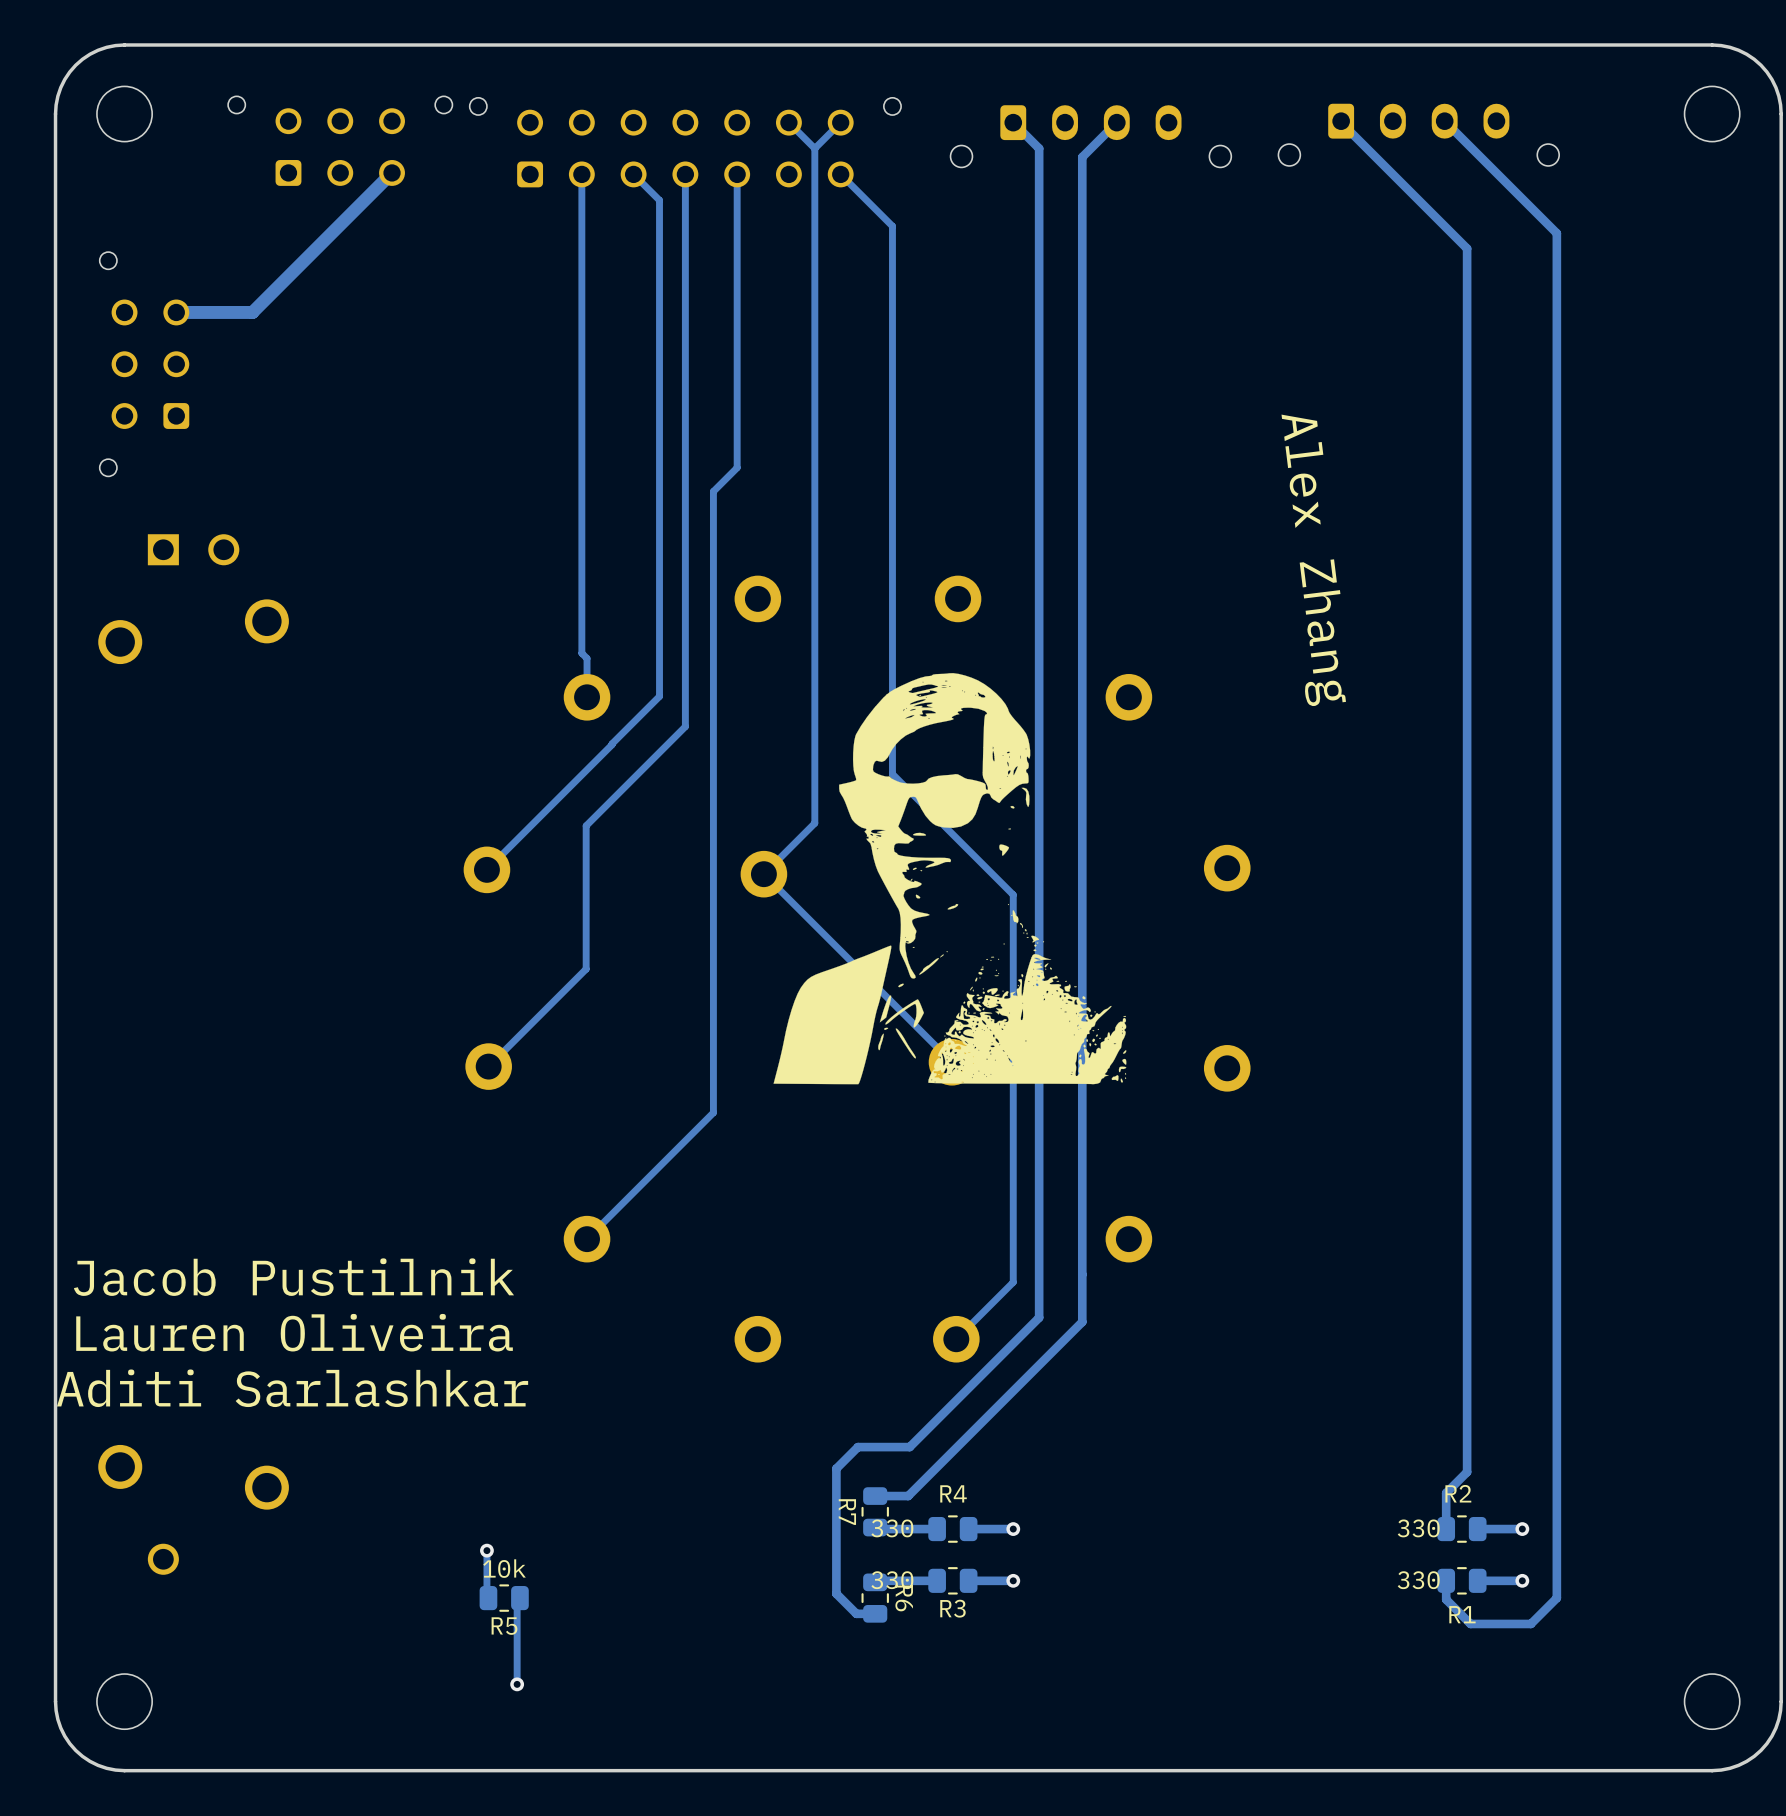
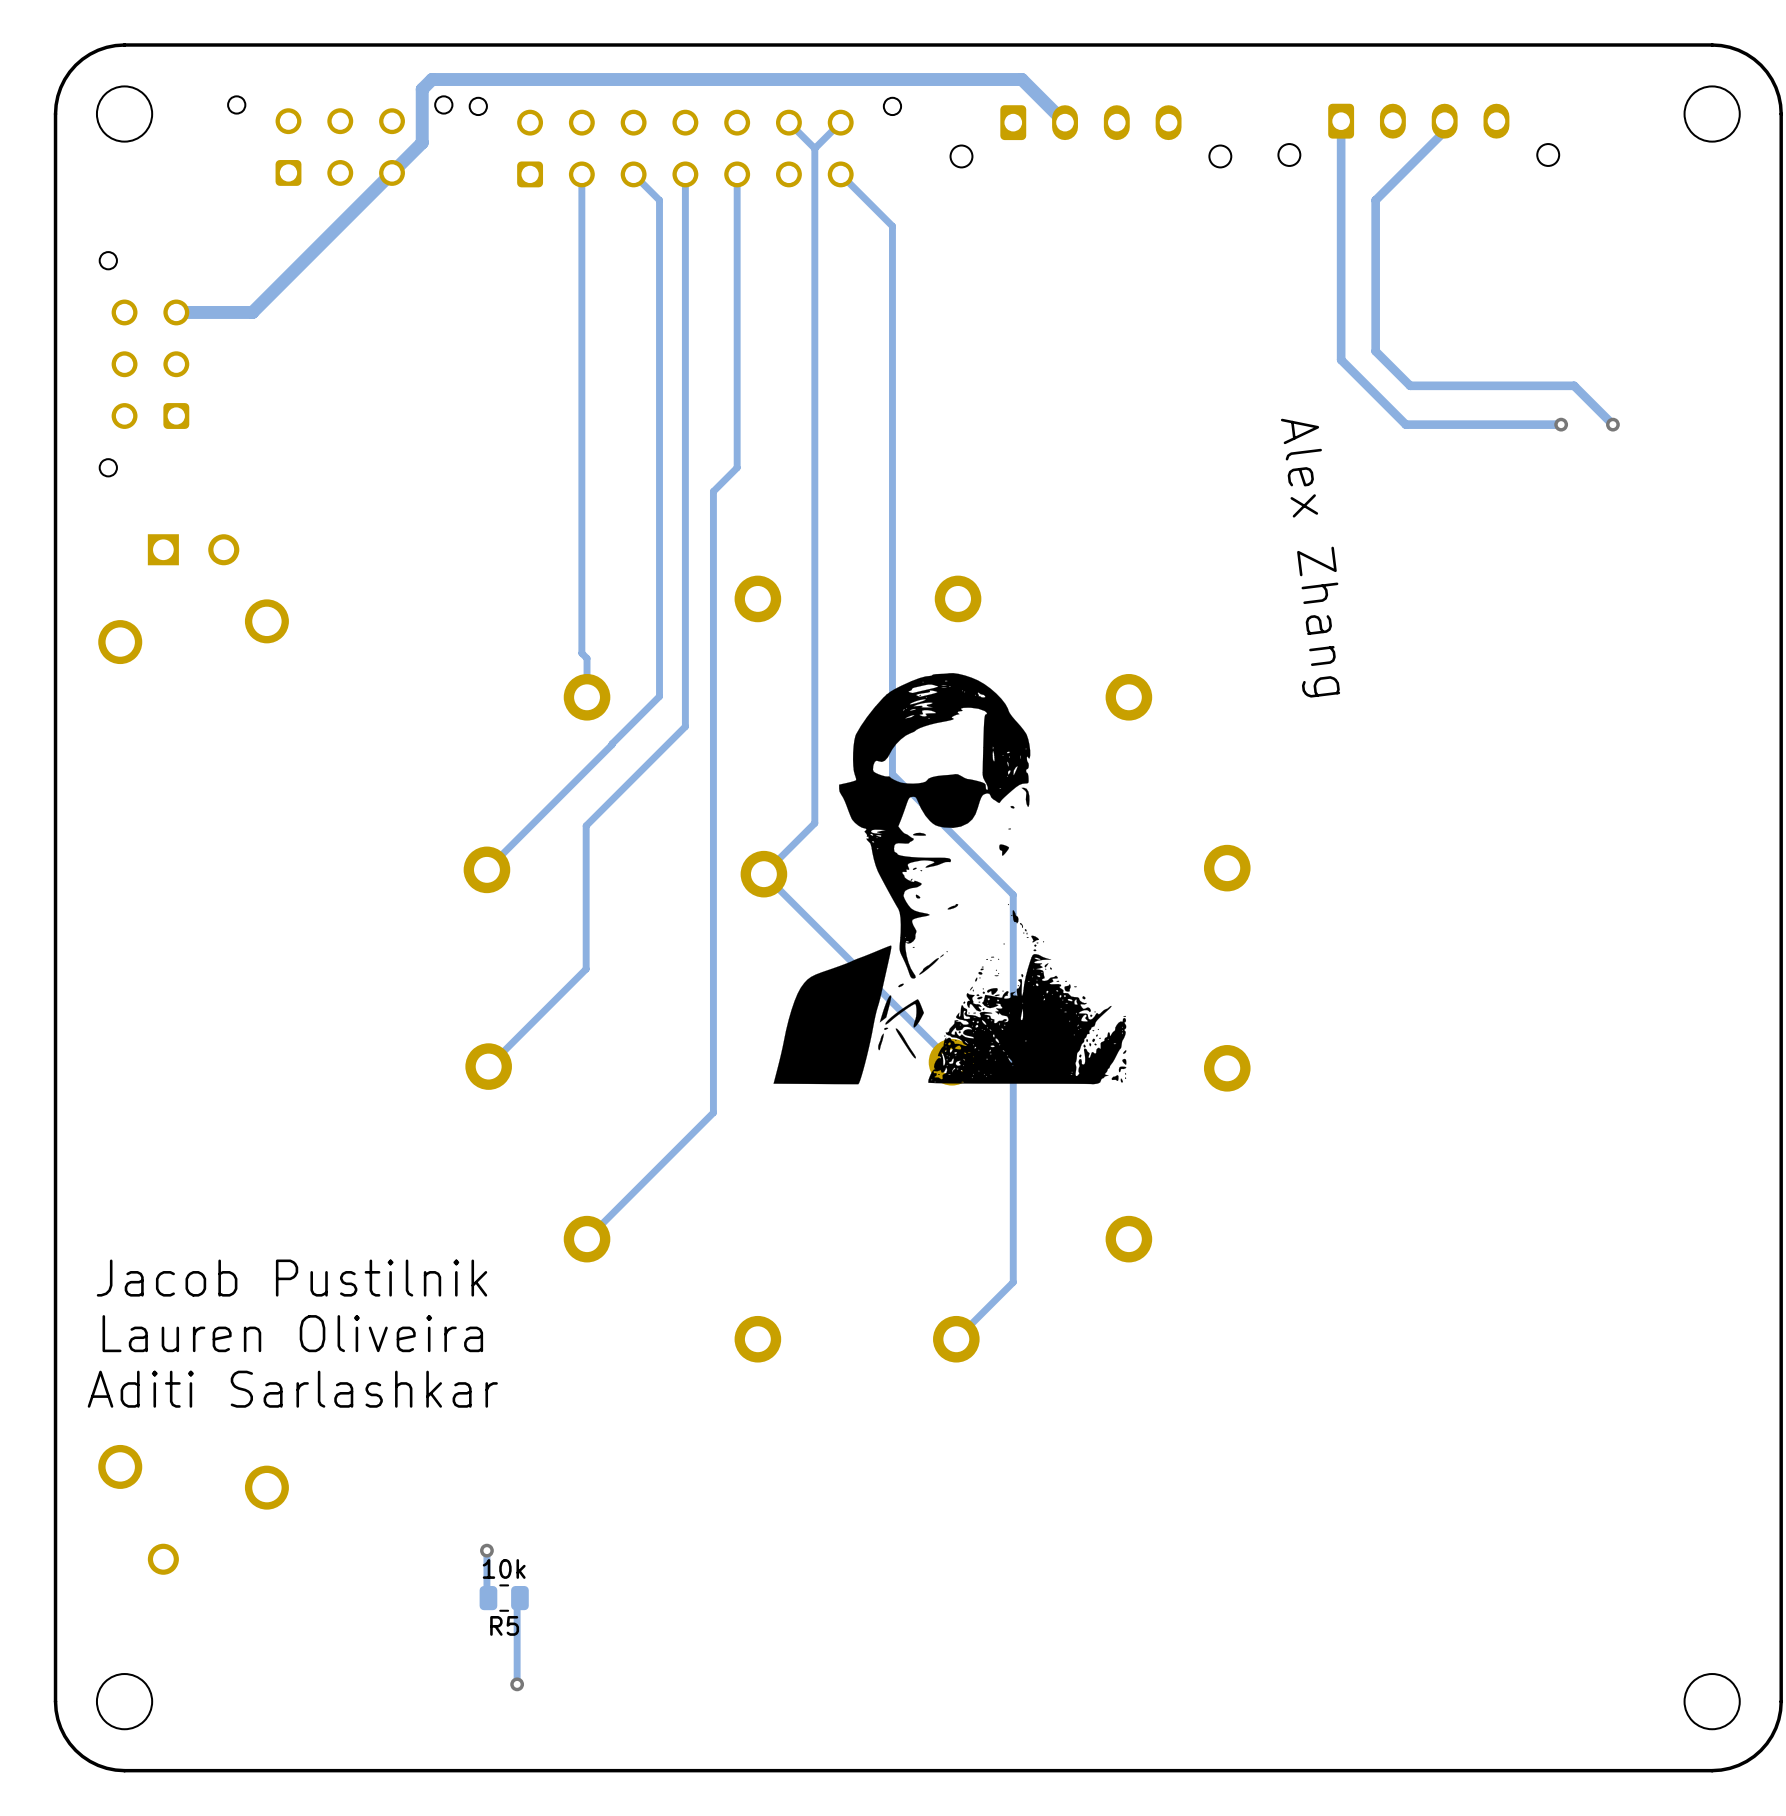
track: (1444, 121) (1556, 233) (1556, 1598) (1530, 1623) (1470, 1623) (1446, 1599) (1446, 1580) -> (1444, 121) (1444, 131) (1375, 200) (1375, 351) (1410, 385) (1574, 385) (1612, 424)
track: (1013, 122) (1039, 148) (1039, 1317) (909, 1447) (857, 1447) (836, 1468) (836, 1593) (856, 1613) (875, 1613) -> none
track: none -> (1065, 122) (1021, 79) (432, 79) (422, 89) (422, 142) (392, 172)
track: (1116, 122) (1082, 157) (1082, 1321) (908, 1496) (875, 1496) -> none
track: (1341, 122) (1467, 248) (1467, 1472) (1446, 1493) (1446, 1529) -> (1341, 122) (1341, 359) (1405, 424) (1561, 424)
via: none -> (1561, 424)
via: none -> (1612, 424)
R7: (875, 1511) -> none
track: (935, 1527) (937, 1529) (875, 1527) -> none
R4: 330 (952, 1529) -> none
track: (1013, 1529) (968, 1529) -> none
via: (1013, 1529) -> none
R1: 330 (1461, 1529) -> none
track: (1522, 1529) (1477, 1529) -> none
via: (1522, 1529) -> none
R3: 330 (952, 1580) -> none
track: (1013, 1580) (968, 1580) -> none
via: (1013, 1580) -> none
R2: 330 (1461, 1580) -> none
track: (1522, 1580) (1477, 1580) -> none
via: (1522, 1580) -> none
track: (935, 1582) (937, 1580) (875, 1582) -> none
R6: (875, 1598) -> none

